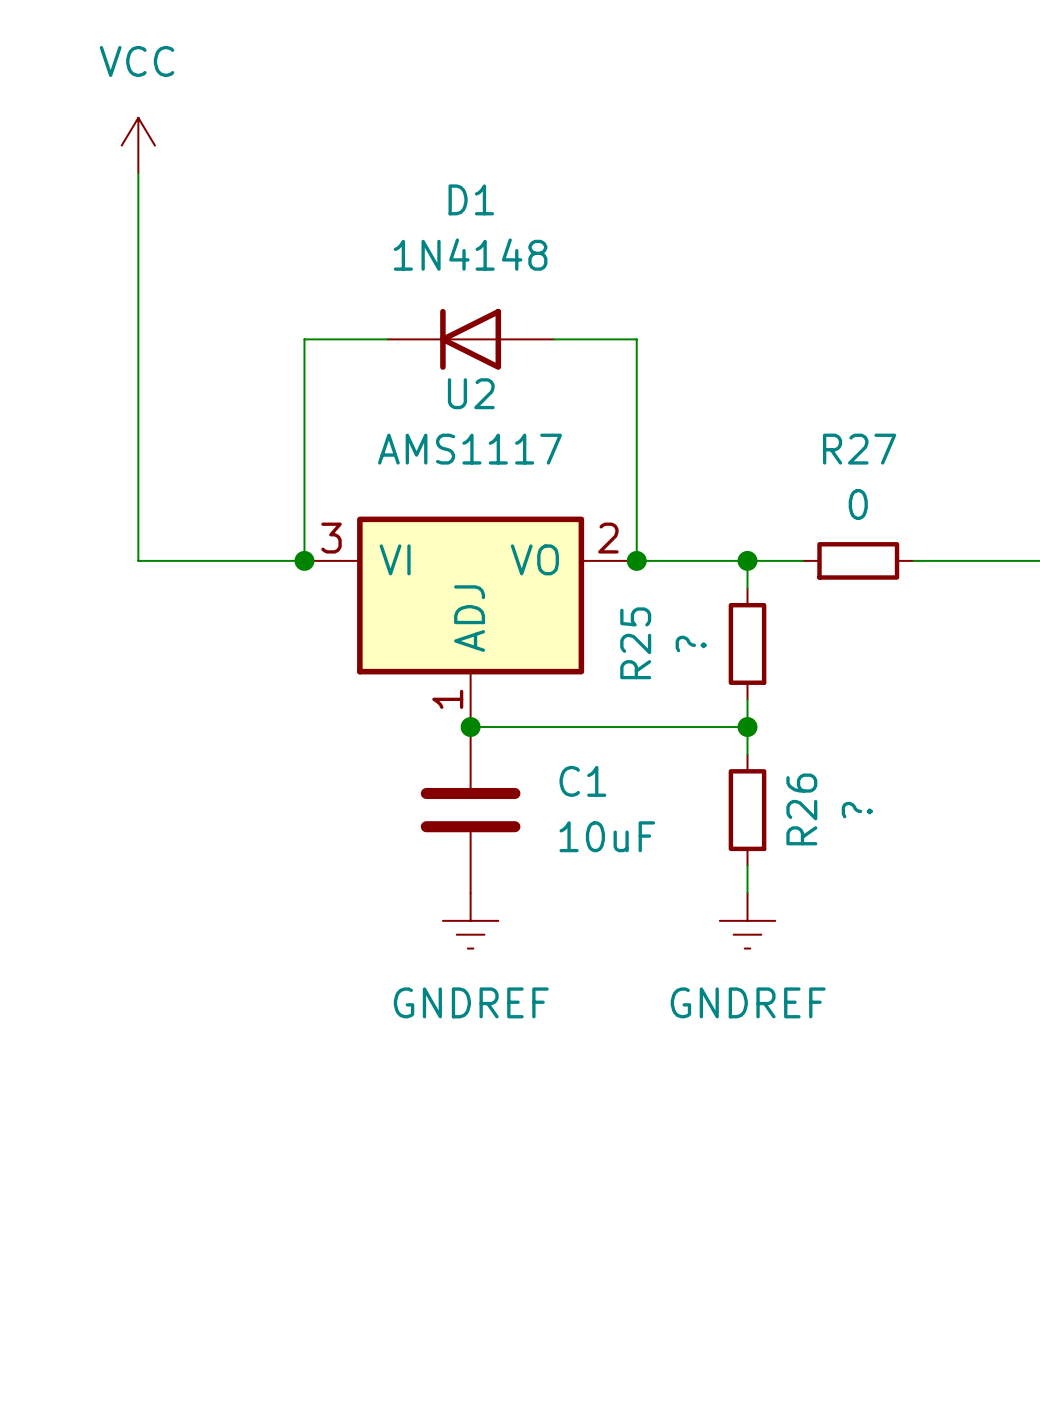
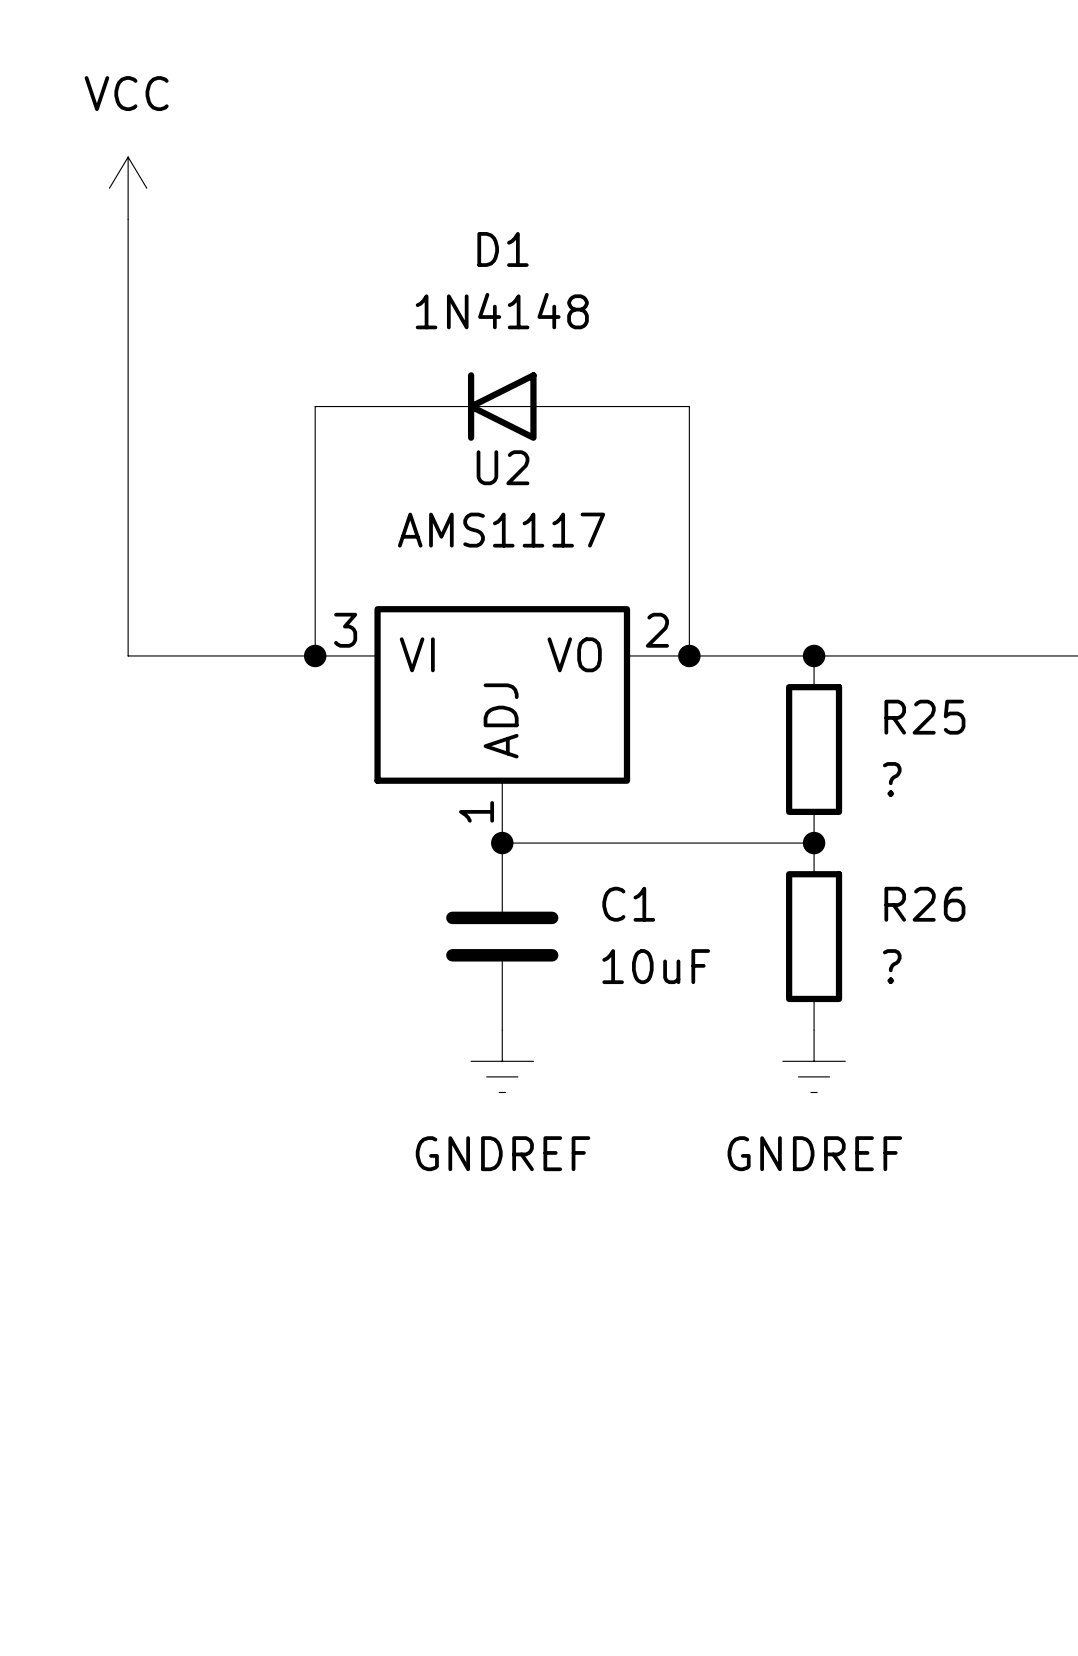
wire: none -> (876, 655) (1001, 655)
R27: 0 (858, 560) -> none
R25 symbol: [728, 588, 767, 700] -> [786, 655, 843, 844]
R25 name position: R25 (635, 643) -> R25 (924, 717)
R25 value position: ? (691, 643) -> ? (892, 779)
R26 symbol: [728, 754, 767, 866] -> [786, 843, 843, 1031]
R26 name position: R26 (801, 809) -> R26 (924, 904)
R26 value position: ? (857, 810) -> ? (892, 966)

